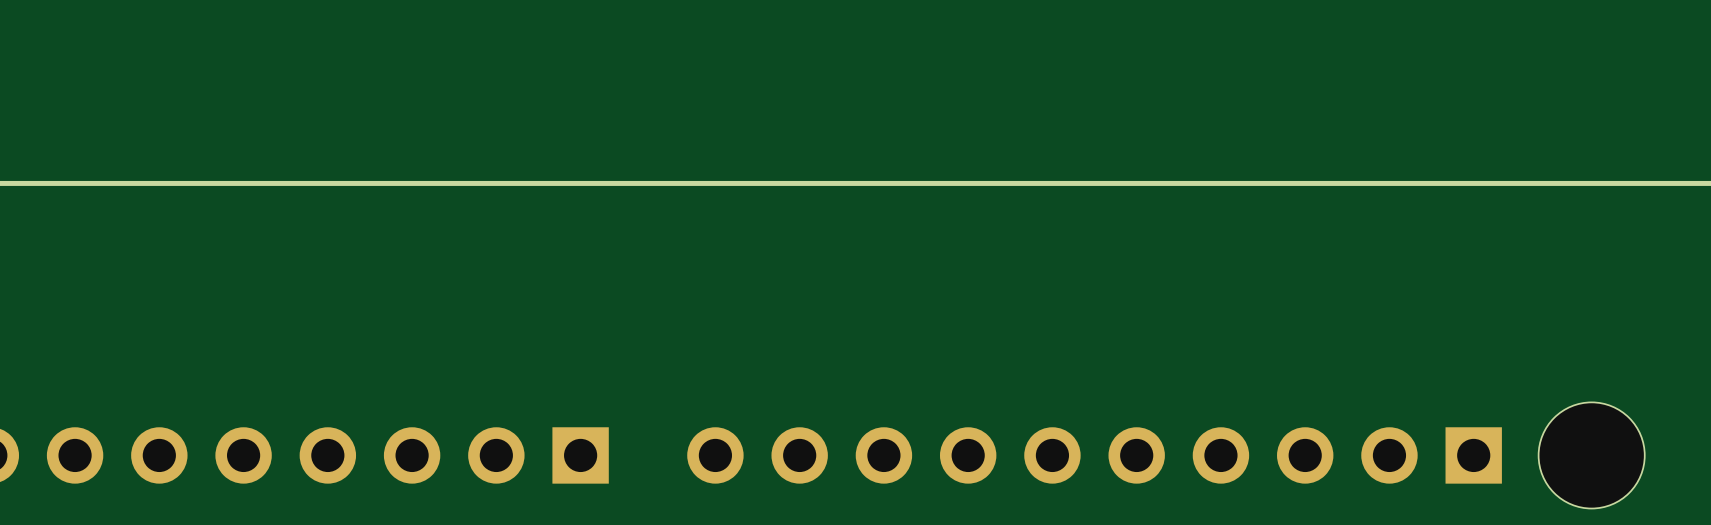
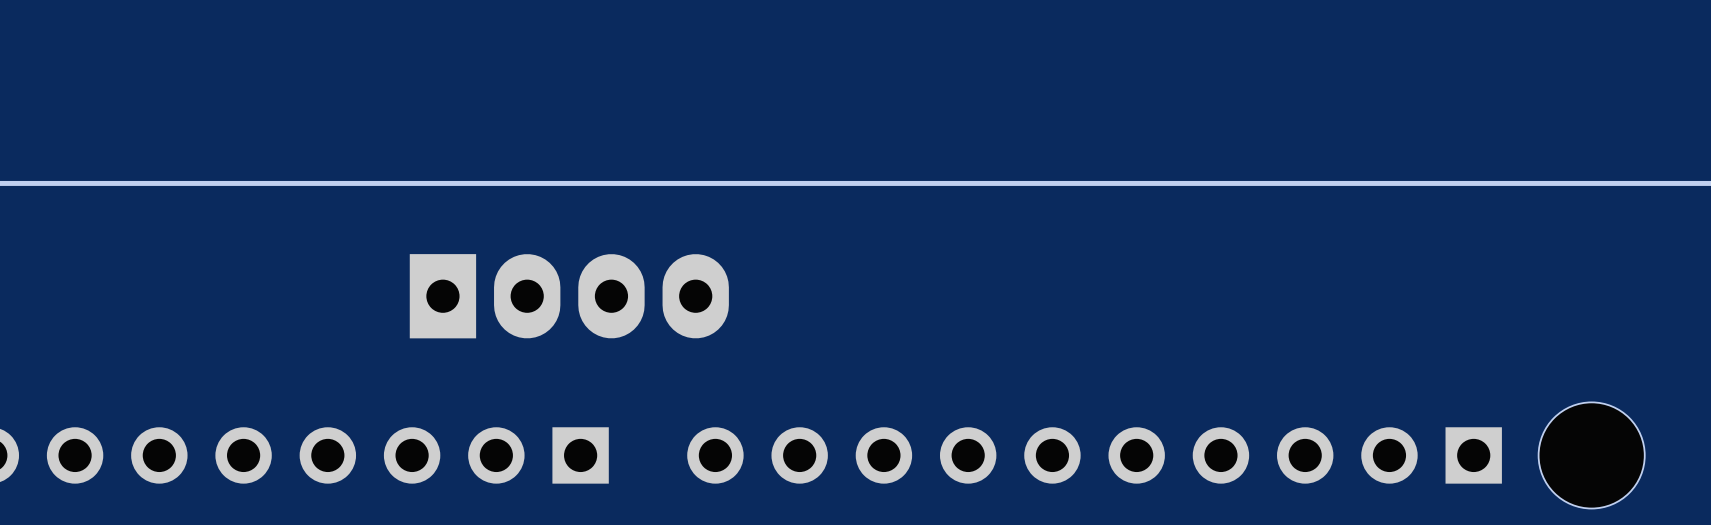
part: none -> (569, 296)

